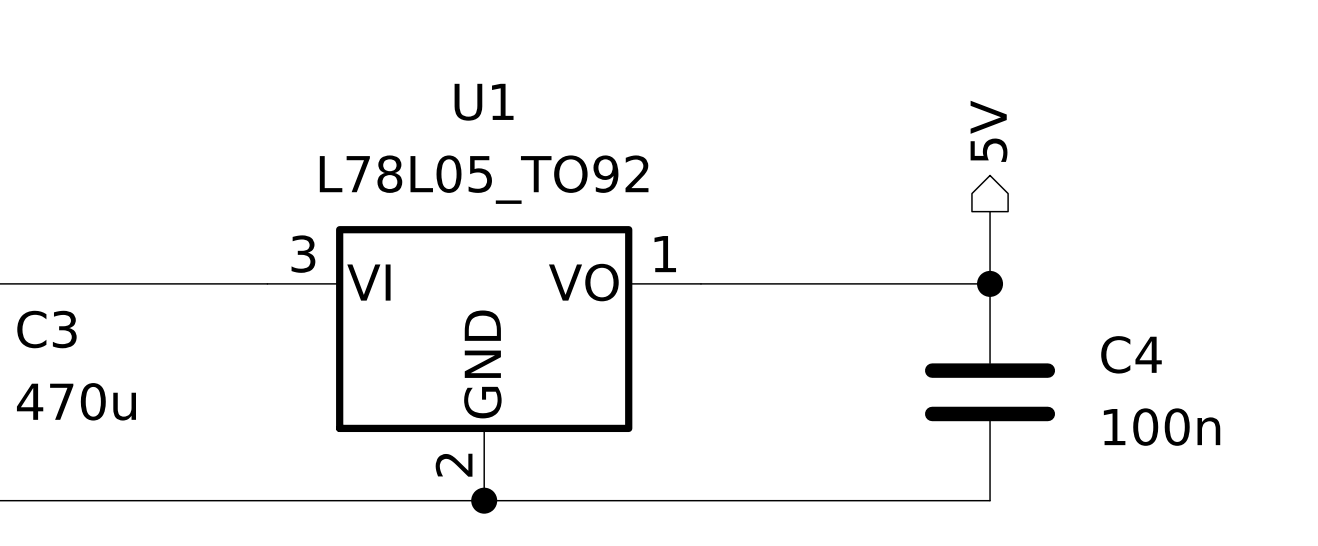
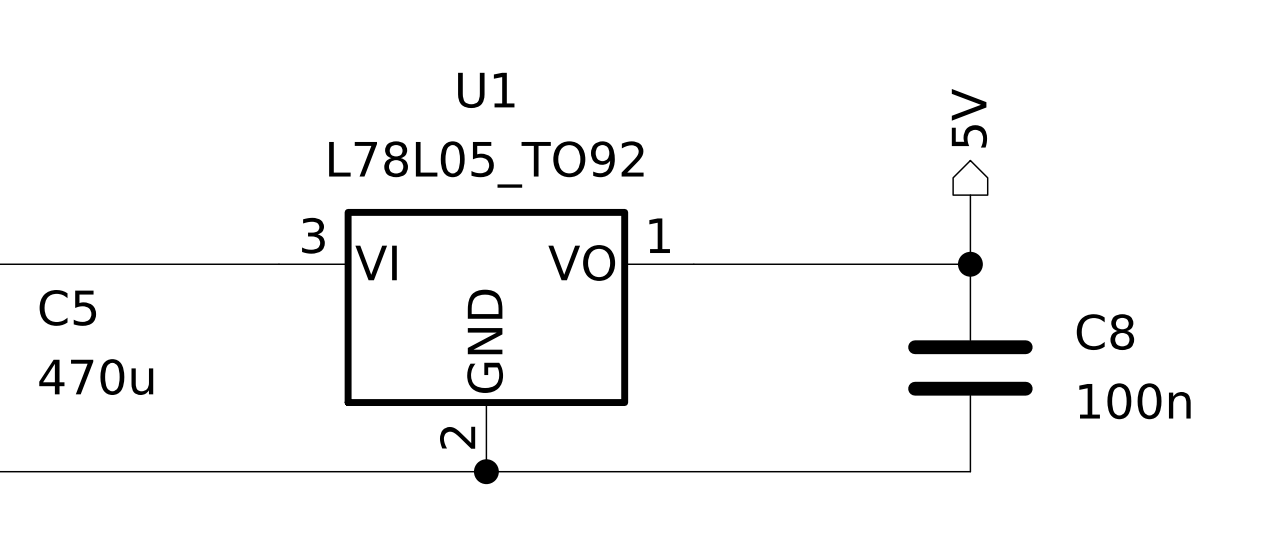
C3 name: C3 (46, 329) -> C5 (67, 307)
C4 name: C4 (1131, 354) -> C8 (1105, 332)

